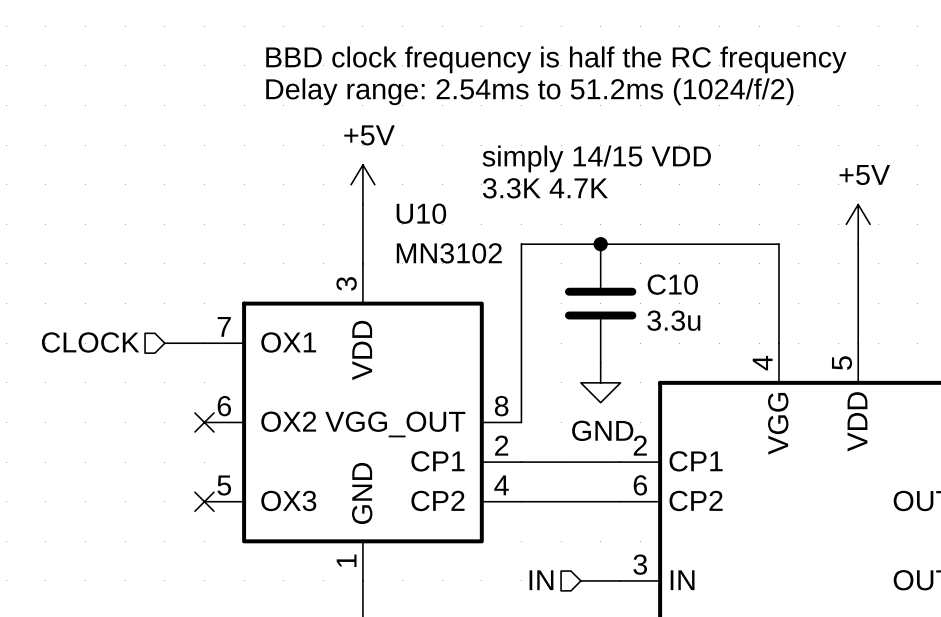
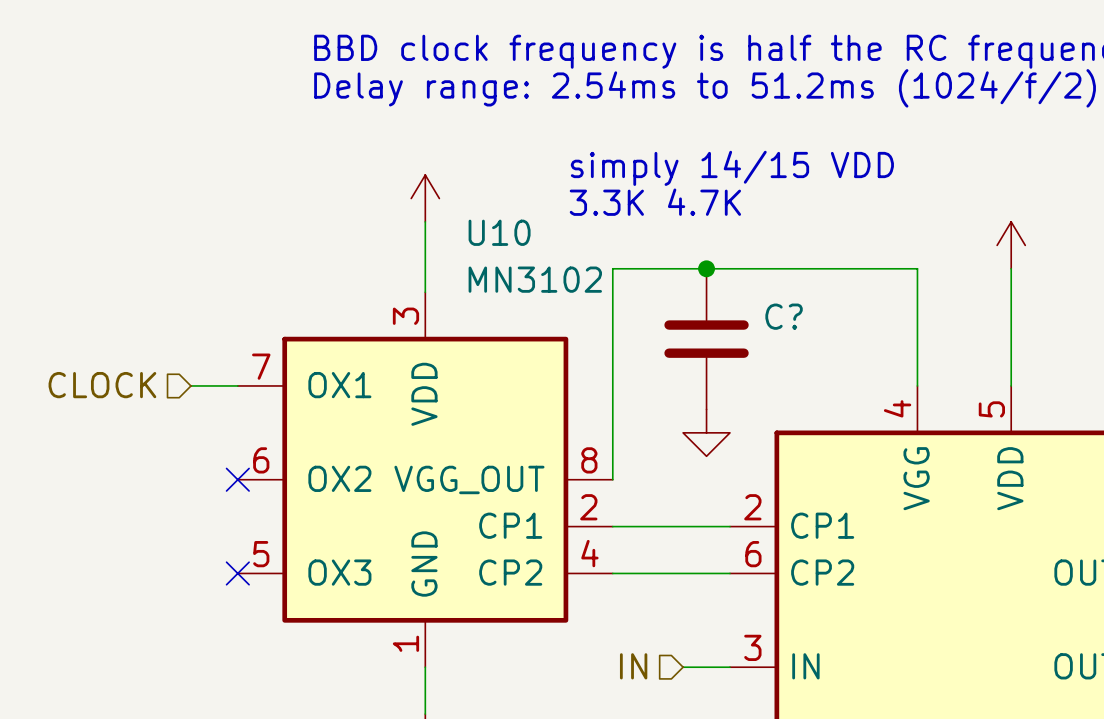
power symbol text: +5V (369, 135) -> none
power symbol text: +5V (864, 175) -> none
C10 name: C10 (672, 284) -> C? (784, 316)
C10 value: 3.3u (673, 320) -> none
power symbol text: GND (602, 430) -> none

